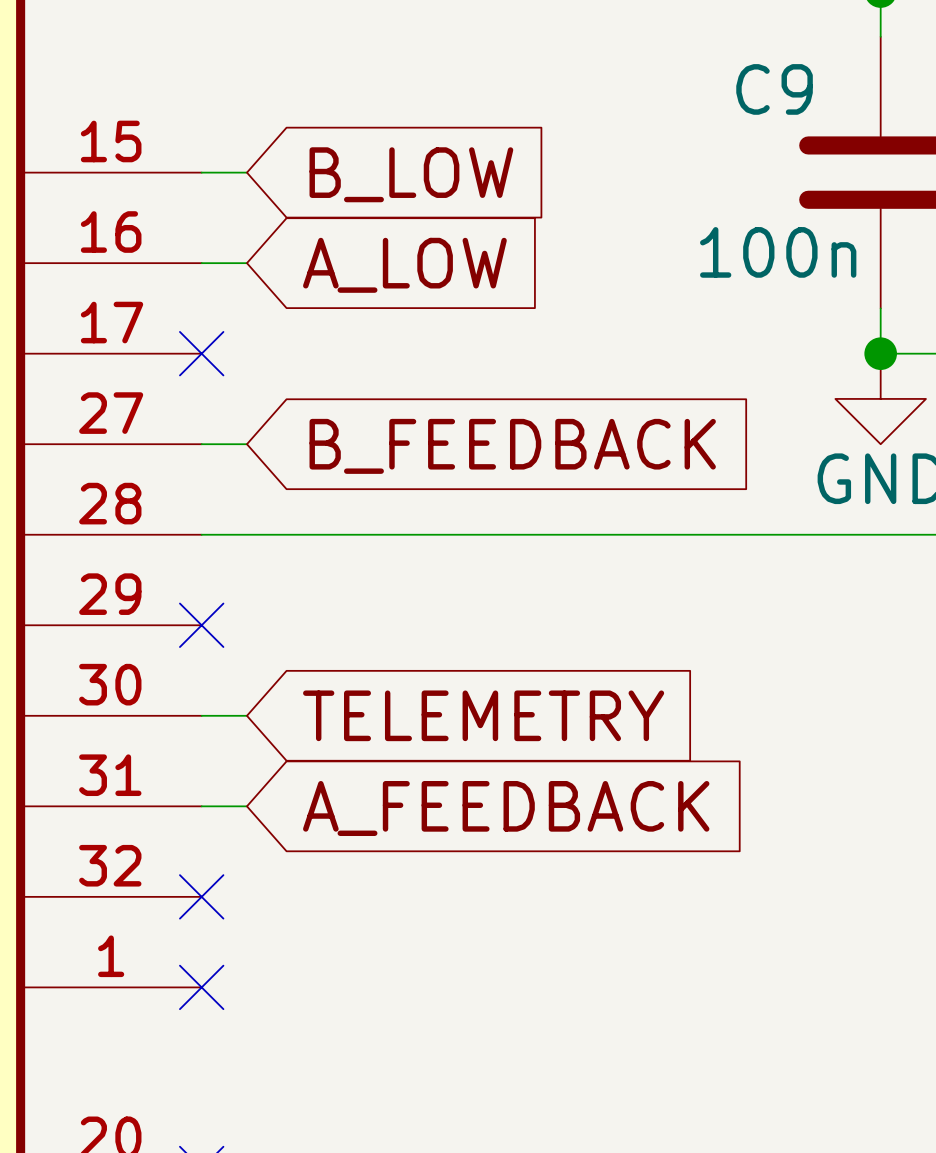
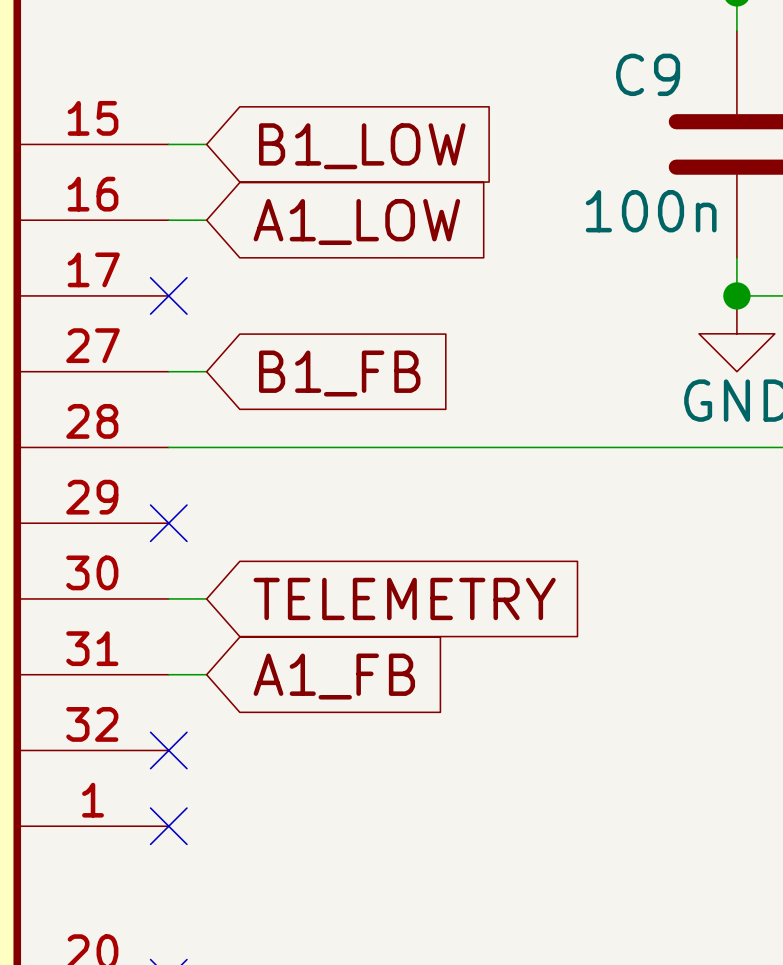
global label: B_LOW (411, 174) -> B1_LOW (362, 146)
global label: A_LOW (404, 265) -> A1_LOW (356, 222)
global label: B_FEEDBACK (512, 446) -> B1_FB (339, 373)
global label: A_FEEDBACK (506, 808) -> A1_FB (334, 676)

